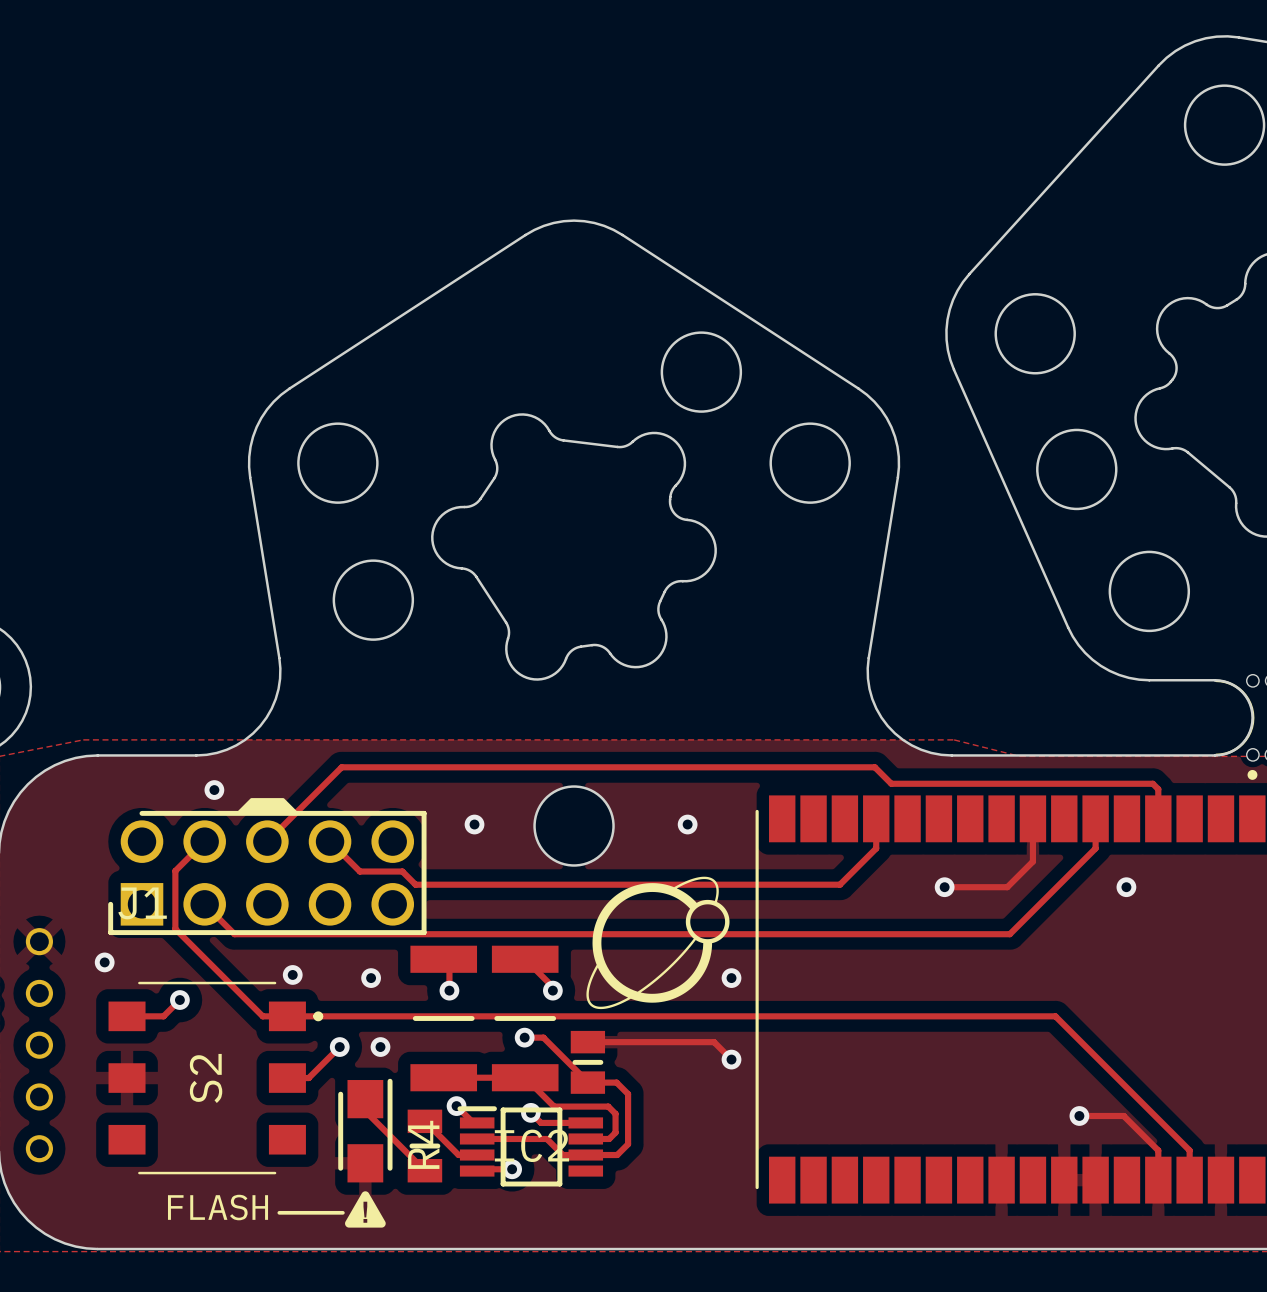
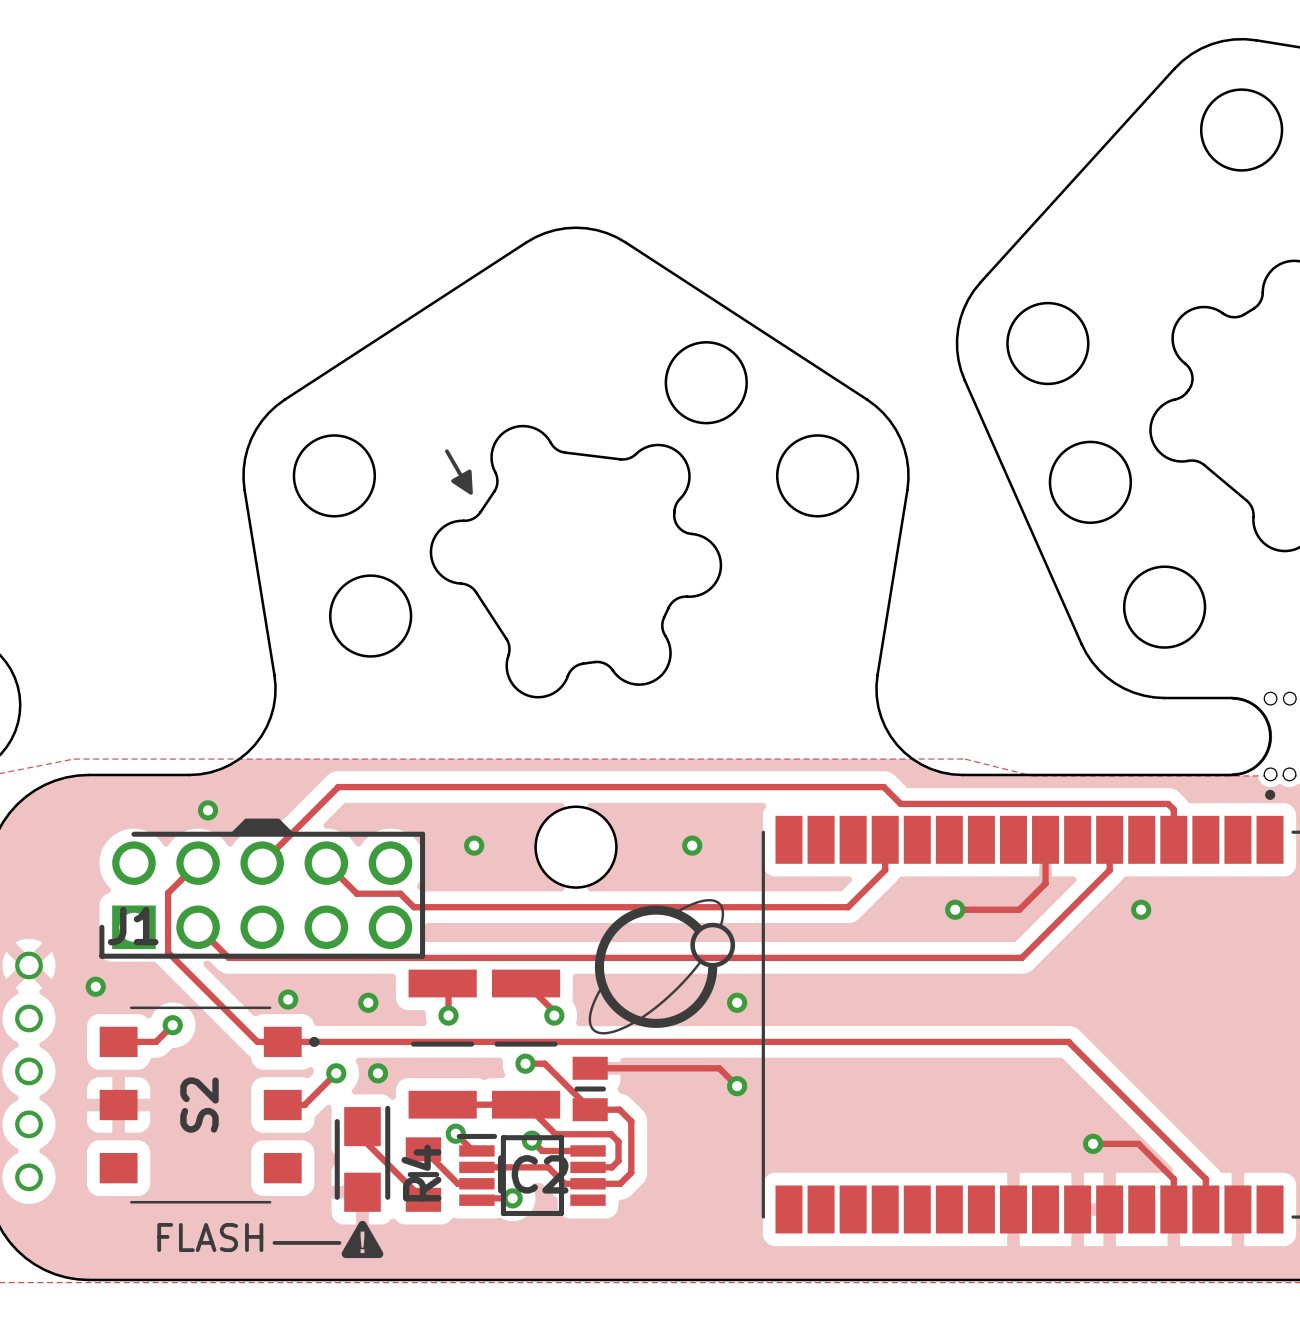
line: none -> (446, 451) (462, 479)
drawing: none -> [451, 469, 473, 495]

